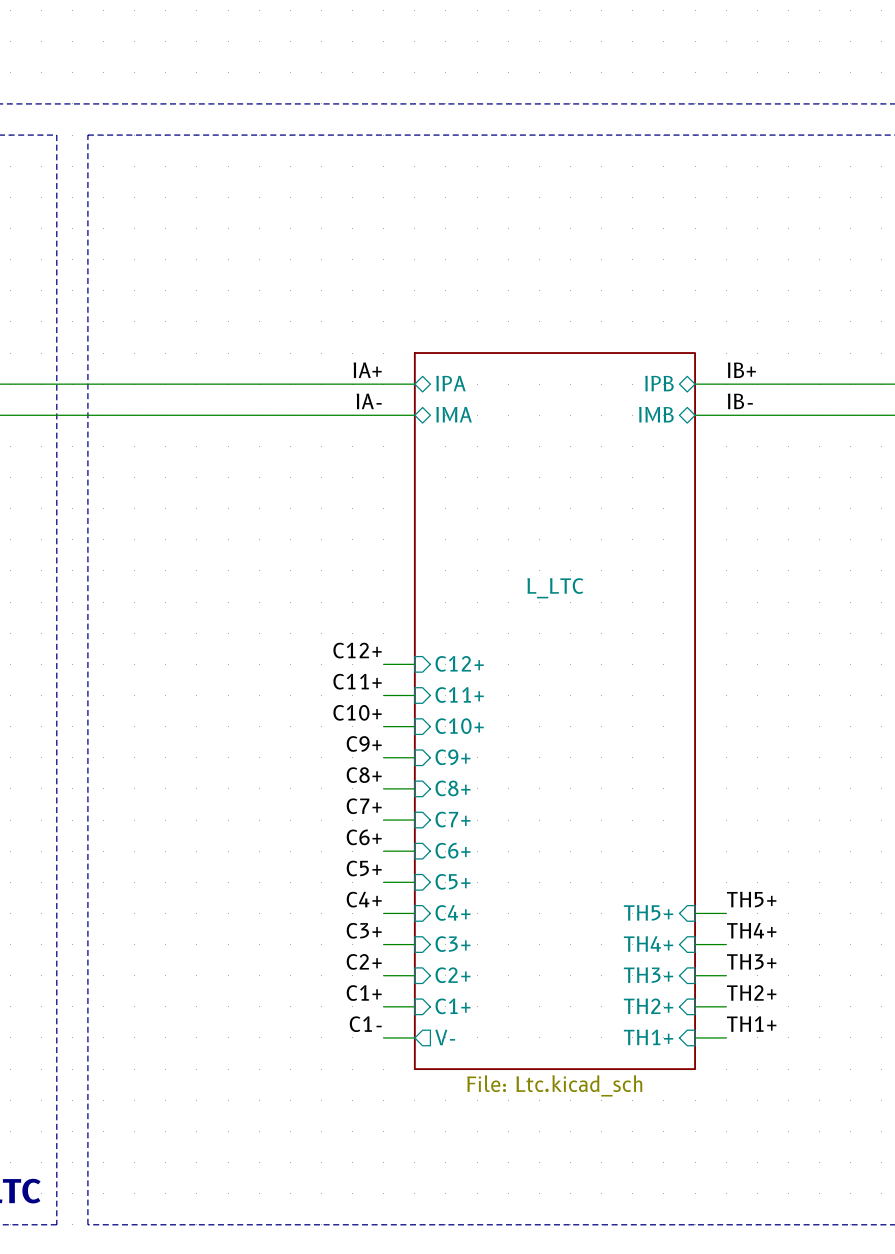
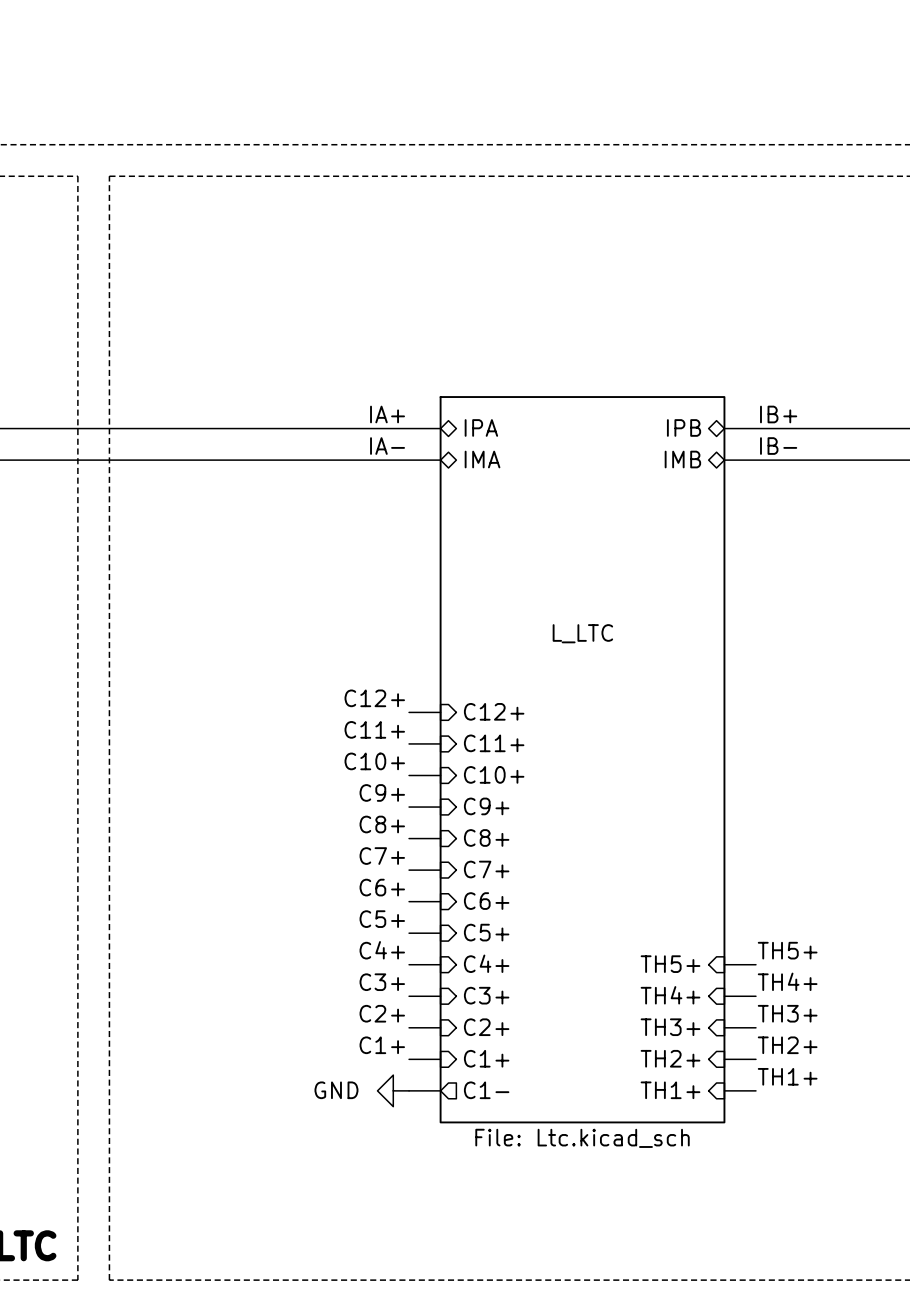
label: C1- (365, 1024) -> none
power symbol: none -> GND (393, 1090)
sheet pin: V- (445, 1037) -> C1- (486, 1090)

